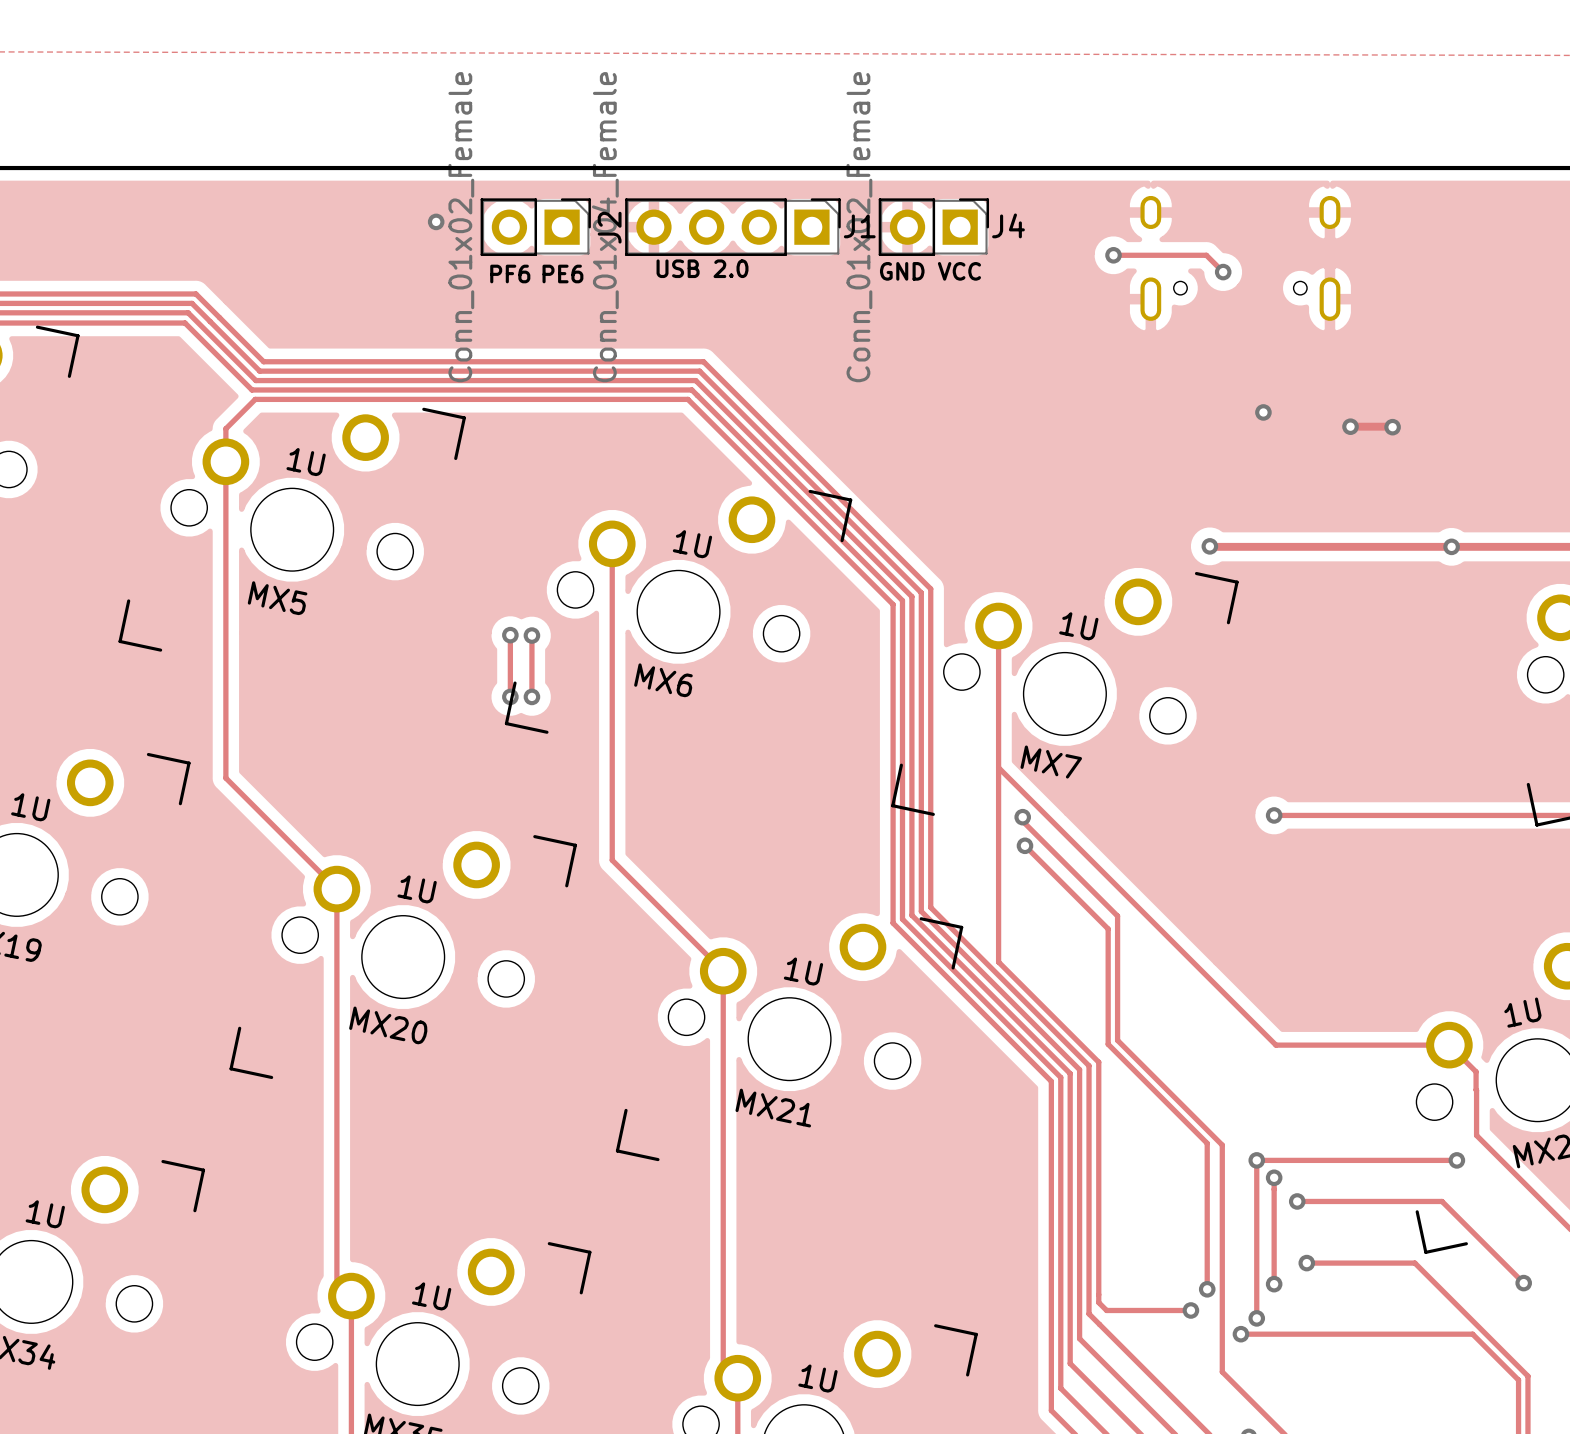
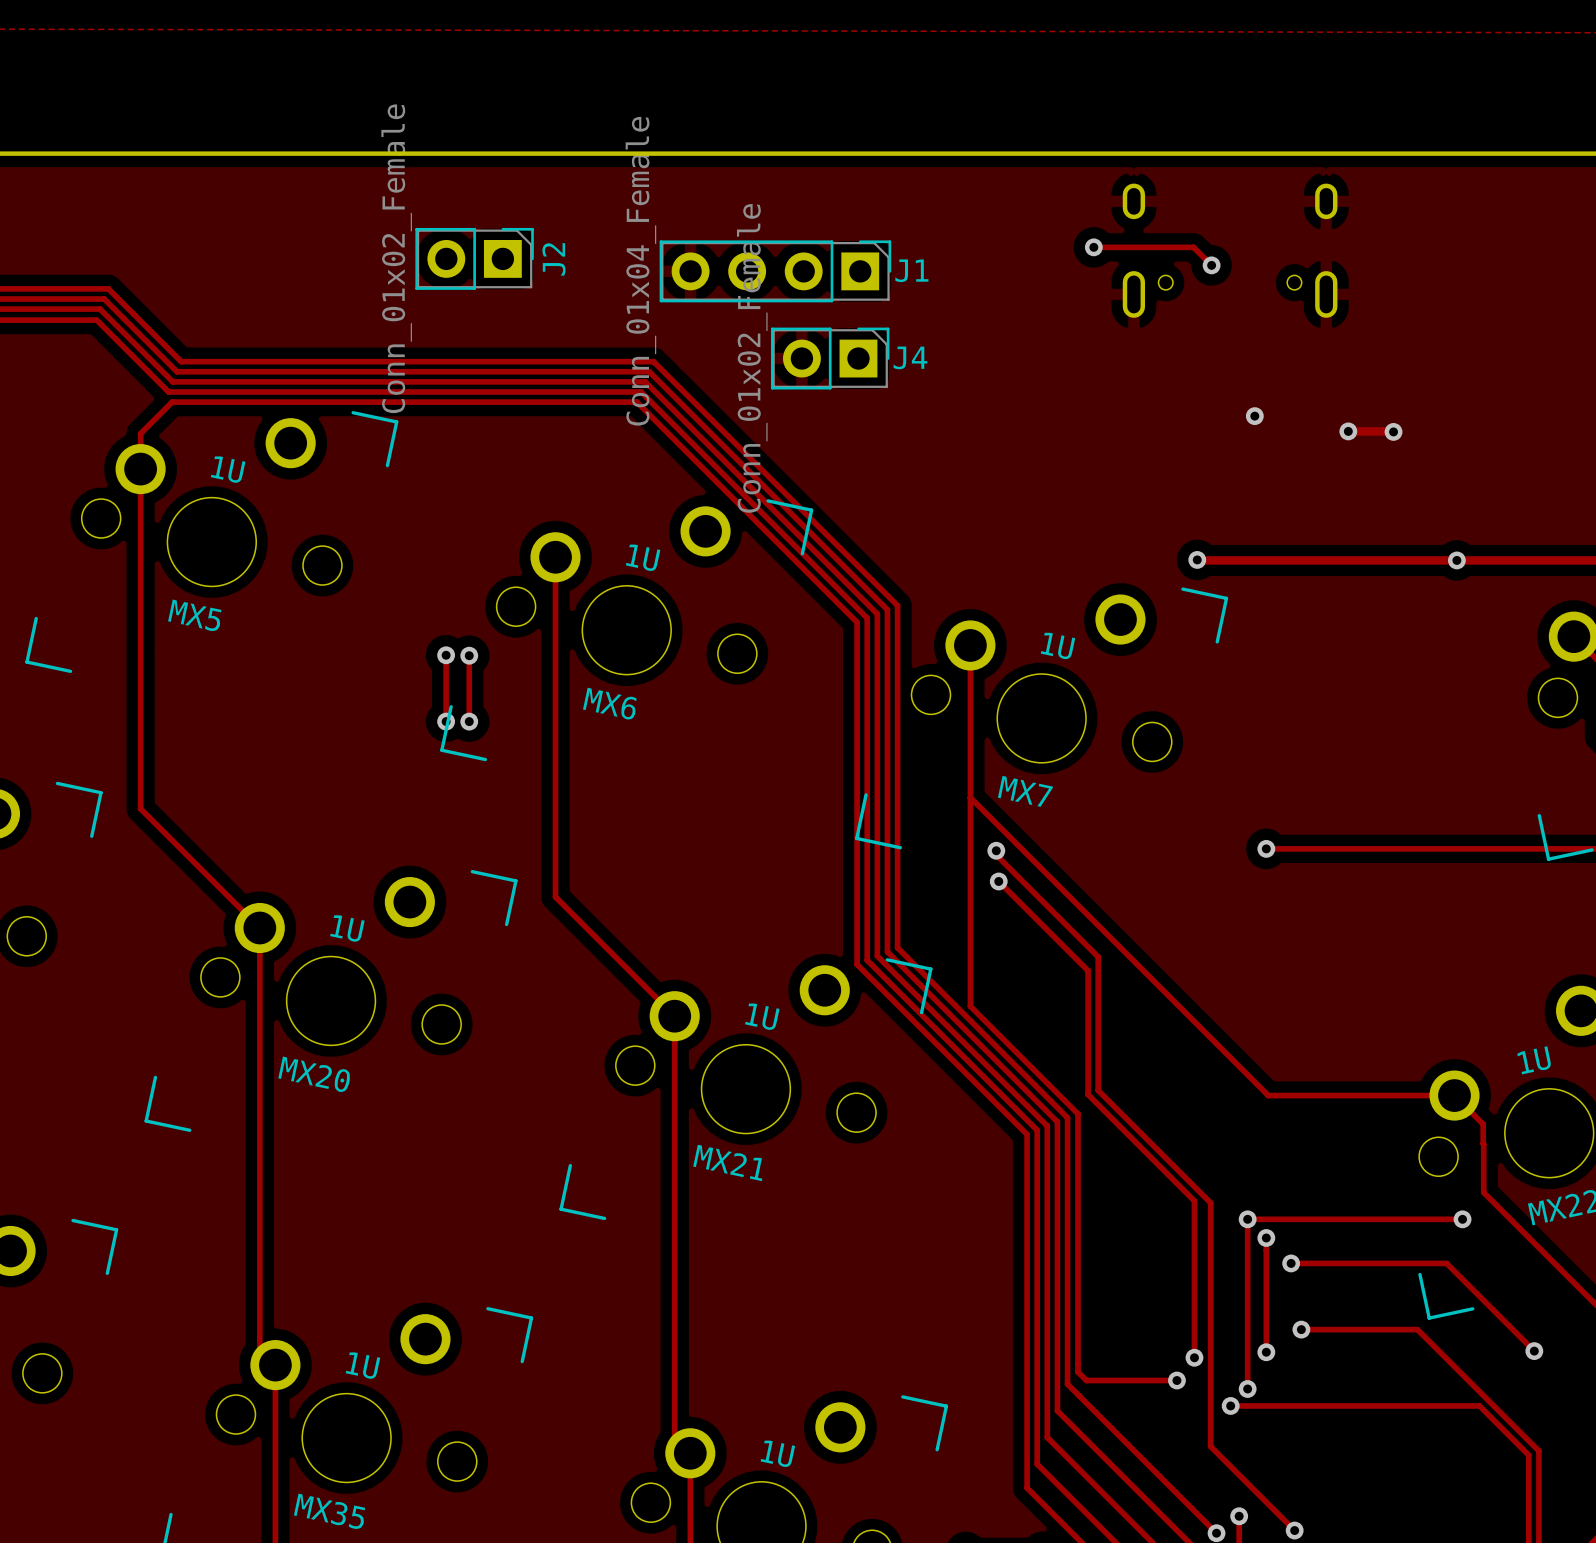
via: (436, 221) -> none
J2 position: (535, 227) -> (474, 258)
J1 position: (732, 227) -> (775, 271)
J4 position: (933, 227) -> (830, 358)
text: USB 2.0 (702, 268) -> none
text: GND (902, 271) -> none
text: VCC (959, 271) -> none
text: PF6 (510, 273) -> none
text: PE6 (562, 273) -> none

